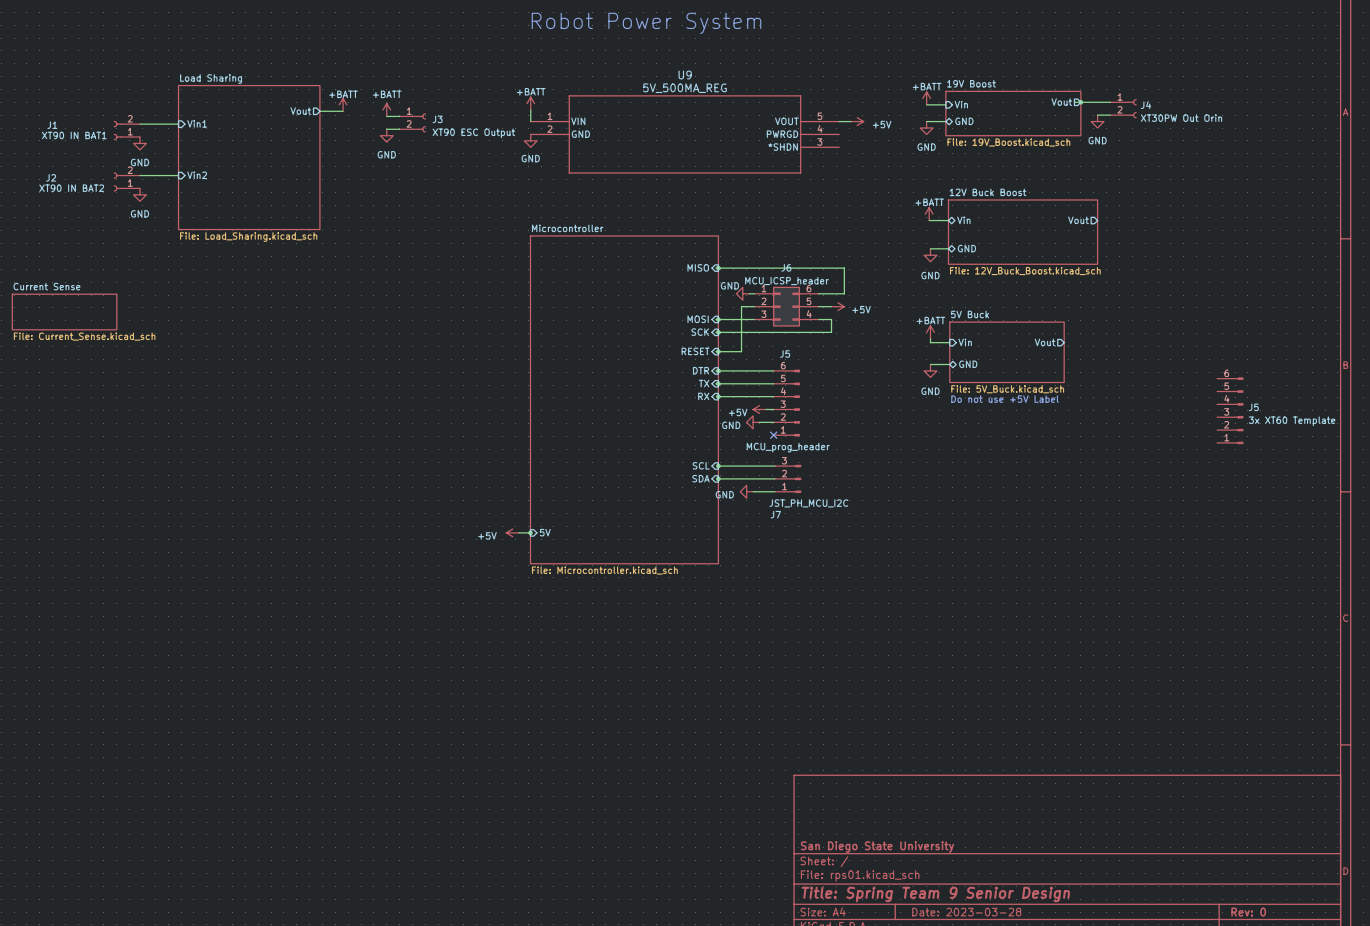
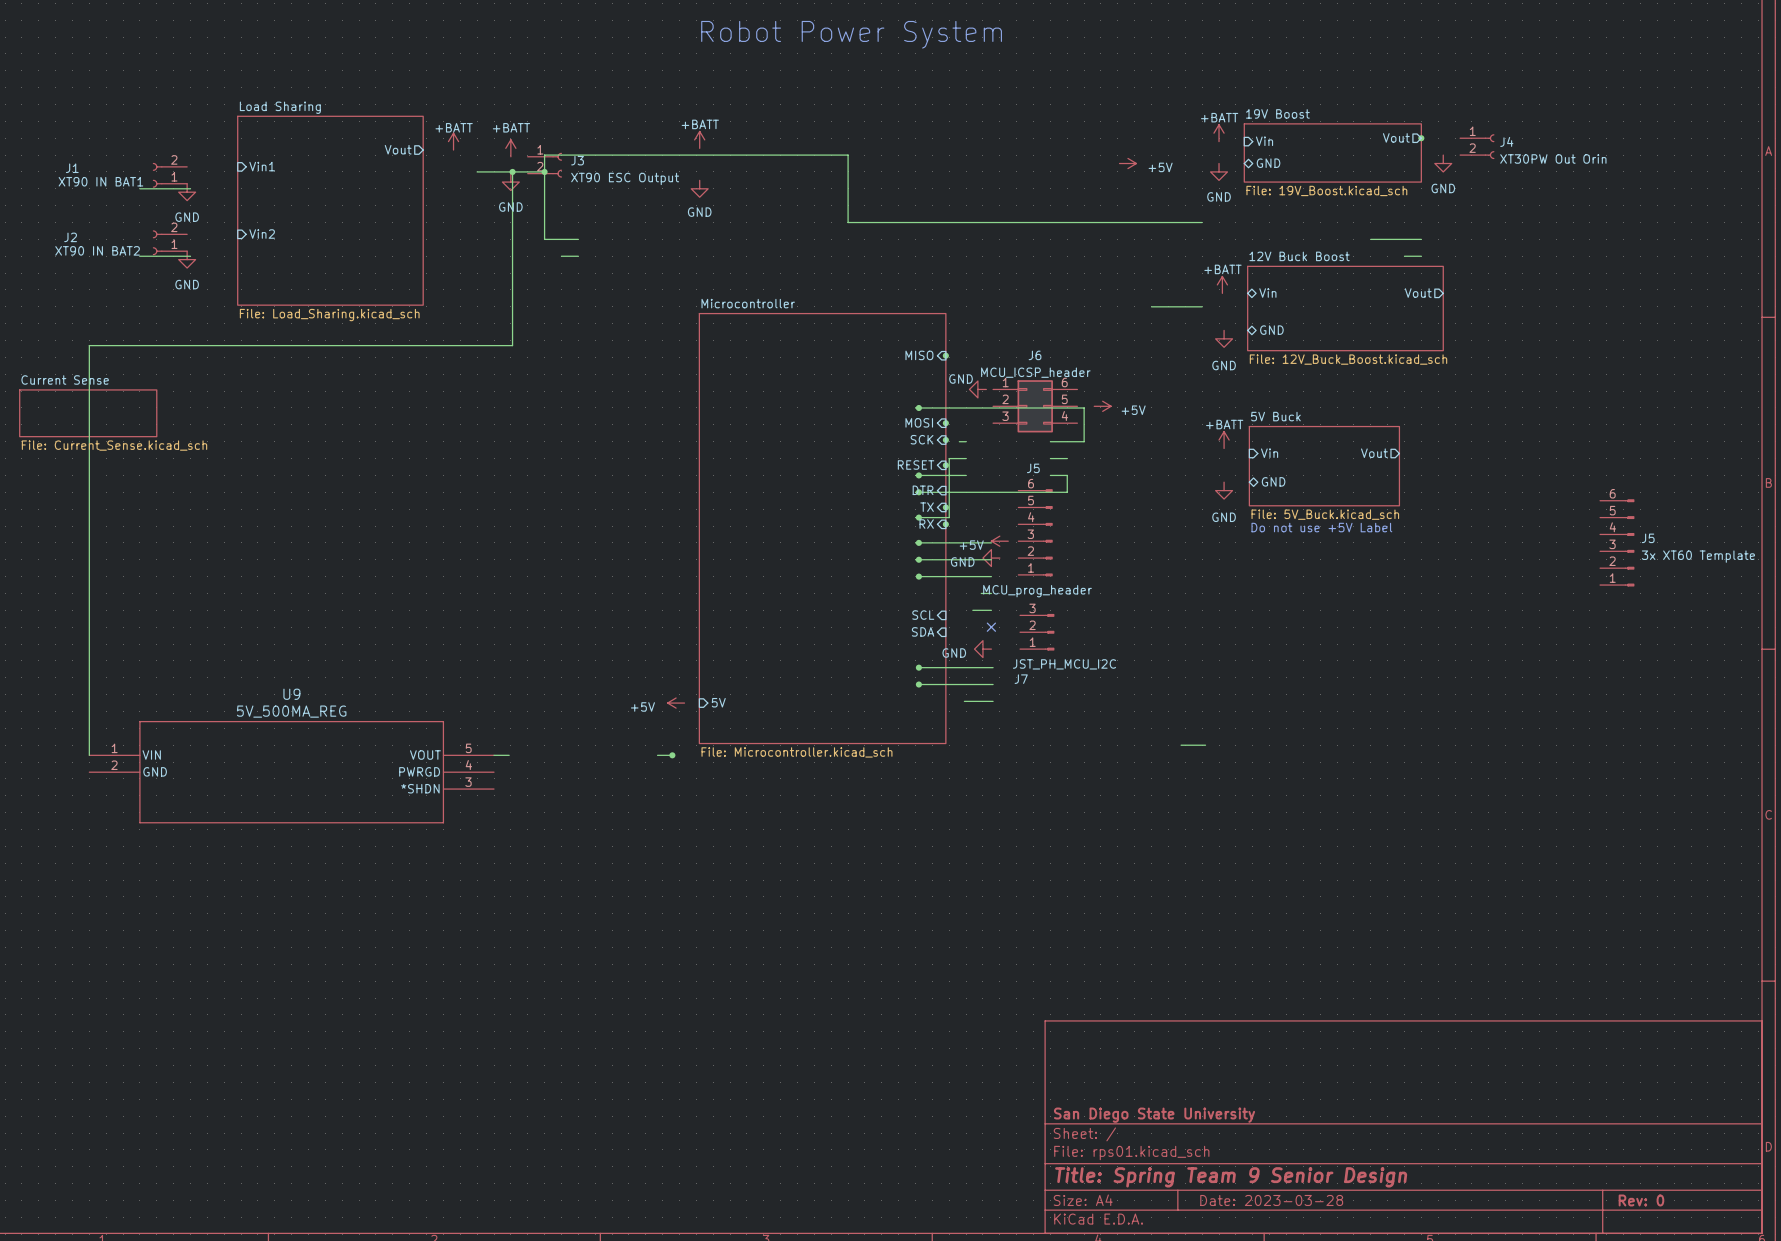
wire: (1074, 102) (1110, 102) -> none
wire: (926, 104) (945, 104) -> none
wire: (530, 110) (530, 121) -> none
wire: (319, 111) (343, 111) -> none
wire: (1097, 115) (1110, 115) -> (1404, 256) (1421, 256)
wire: (386, 116) (399, 116) -> none
wire: (839, 121) (850, 121) -> none
wire: (926, 121) (945, 121) -> none
wire: (139, 124) (178, 124) -> (139, 188) (190, 188)
wire: none -> (477, 171) (544, 171)
wire: none -> (512, 171) (512, 345) (89, 345) (89, 755)
junction: none -> (512, 171)
junction: none -> (544, 171)
wire: (386, 129) (399, 129) -> (561, 256) (578, 256)
U9 position: (684, 134) -> (291, 772)
wire: none -> (1202, 222) (848, 222) (848, 155) (544, 155) (544, 239) (578, 239)
wire: (139, 175) (178, 175) -> (139, 256) (190, 256)
wire: none -> (1370, 239) (1421, 239)
wire: (929, 220) (948, 220) -> none
wire: none -> (1151, 306) (1202, 306)
wire: (930, 248) (948, 248) -> none
wire: (715, 268) (844, 268) (844, 293) (818, 293) -> (915, 407) (1084, 407) (1084, 441) (1050, 441)
wire: (749, 293) (754, 293) -> (959, 441) (966, 441)
wire: (754, 306) (741, 306) (741, 351) (715, 351) -> (966, 458) (949, 458) (949, 517) (915, 517)
wire: (818, 306) (831, 306) -> (1050, 458) (1067, 458)
junction: none -> (918, 407)
wire: (715, 319) (754, 319) -> (915, 475) (966, 475)
wire: (818, 319) (831, 319) (831, 332) (715, 332) -> (1050, 475) (1067, 475) (1067, 492) (915, 492)
wire: (930, 338) (930, 342) (949, 342) -> none
junction: none -> (918, 475)
wire: (930, 364) (949, 364) -> none
wire: (715, 370) (773, 370) -> (915, 542) (991, 542)
junction: (718, 370) -> none
junction: none -> (918, 492)
wire: (715, 383) (773, 383) -> (915, 559) (991, 559)
junction: none -> (918, 517)
wire: (717, 396) (773, 396) -> (917, 576) (991, 576)
wire: (765, 409) (773, 409) -> (981, 593) (991, 593)
junction: none -> (918, 542)
wire: (759, 422) (773, 422) -> (972, 610) (991, 610)
junction: none -> (918, 559)
no-connect mark: (773, 435) -> none
junction: none -> (918, 576)
wire: (717, 466) (774, 466) -> (917, 667) (993, 667)
junction: (718, 466) -> none
no-connect mark: none -> (991, 627)
wire: (717, 478) (774, 478) -> (917, 684) (993, 684)
junction: (718, 478) -> none
wire: (753, 491) (774, 491) -> (964, 701) (993, 701)
junction: none -> (918, 667)
junction: none -> (918, 684)
wire: (519, 532) (530, 532) -> (657, 755) (672, 755)
junction: (530, 532) -> none
wire: none -> (1181, 745) (1205, 745)
wire: none -> (494, 755) (509, 755)
junction: none -> (672, 755)

